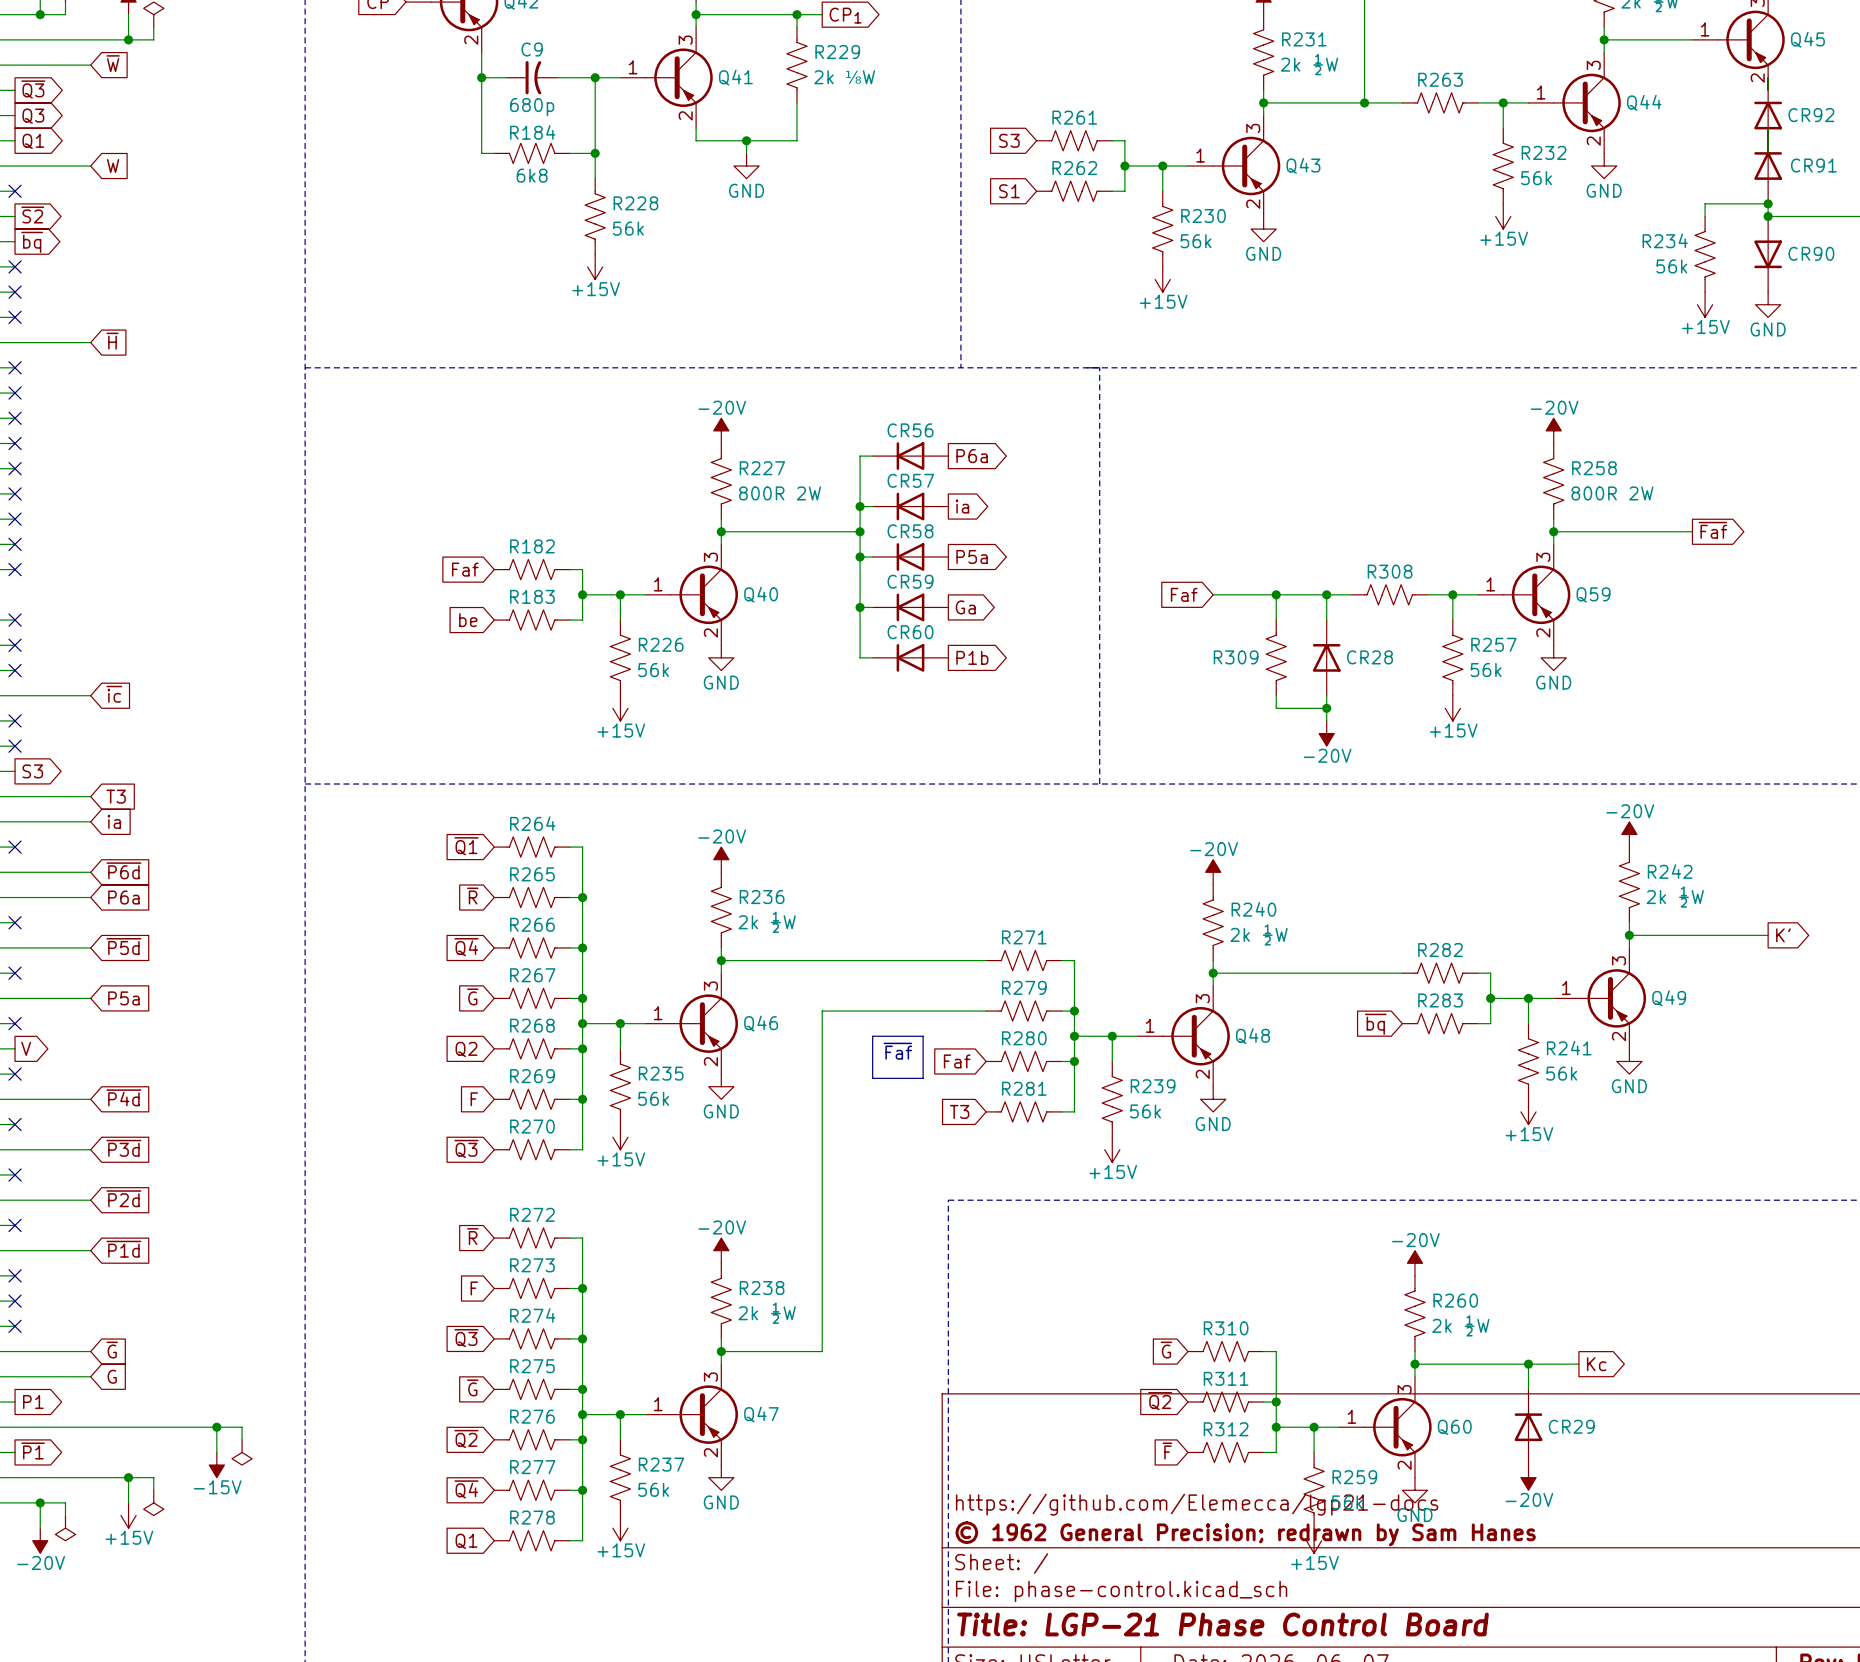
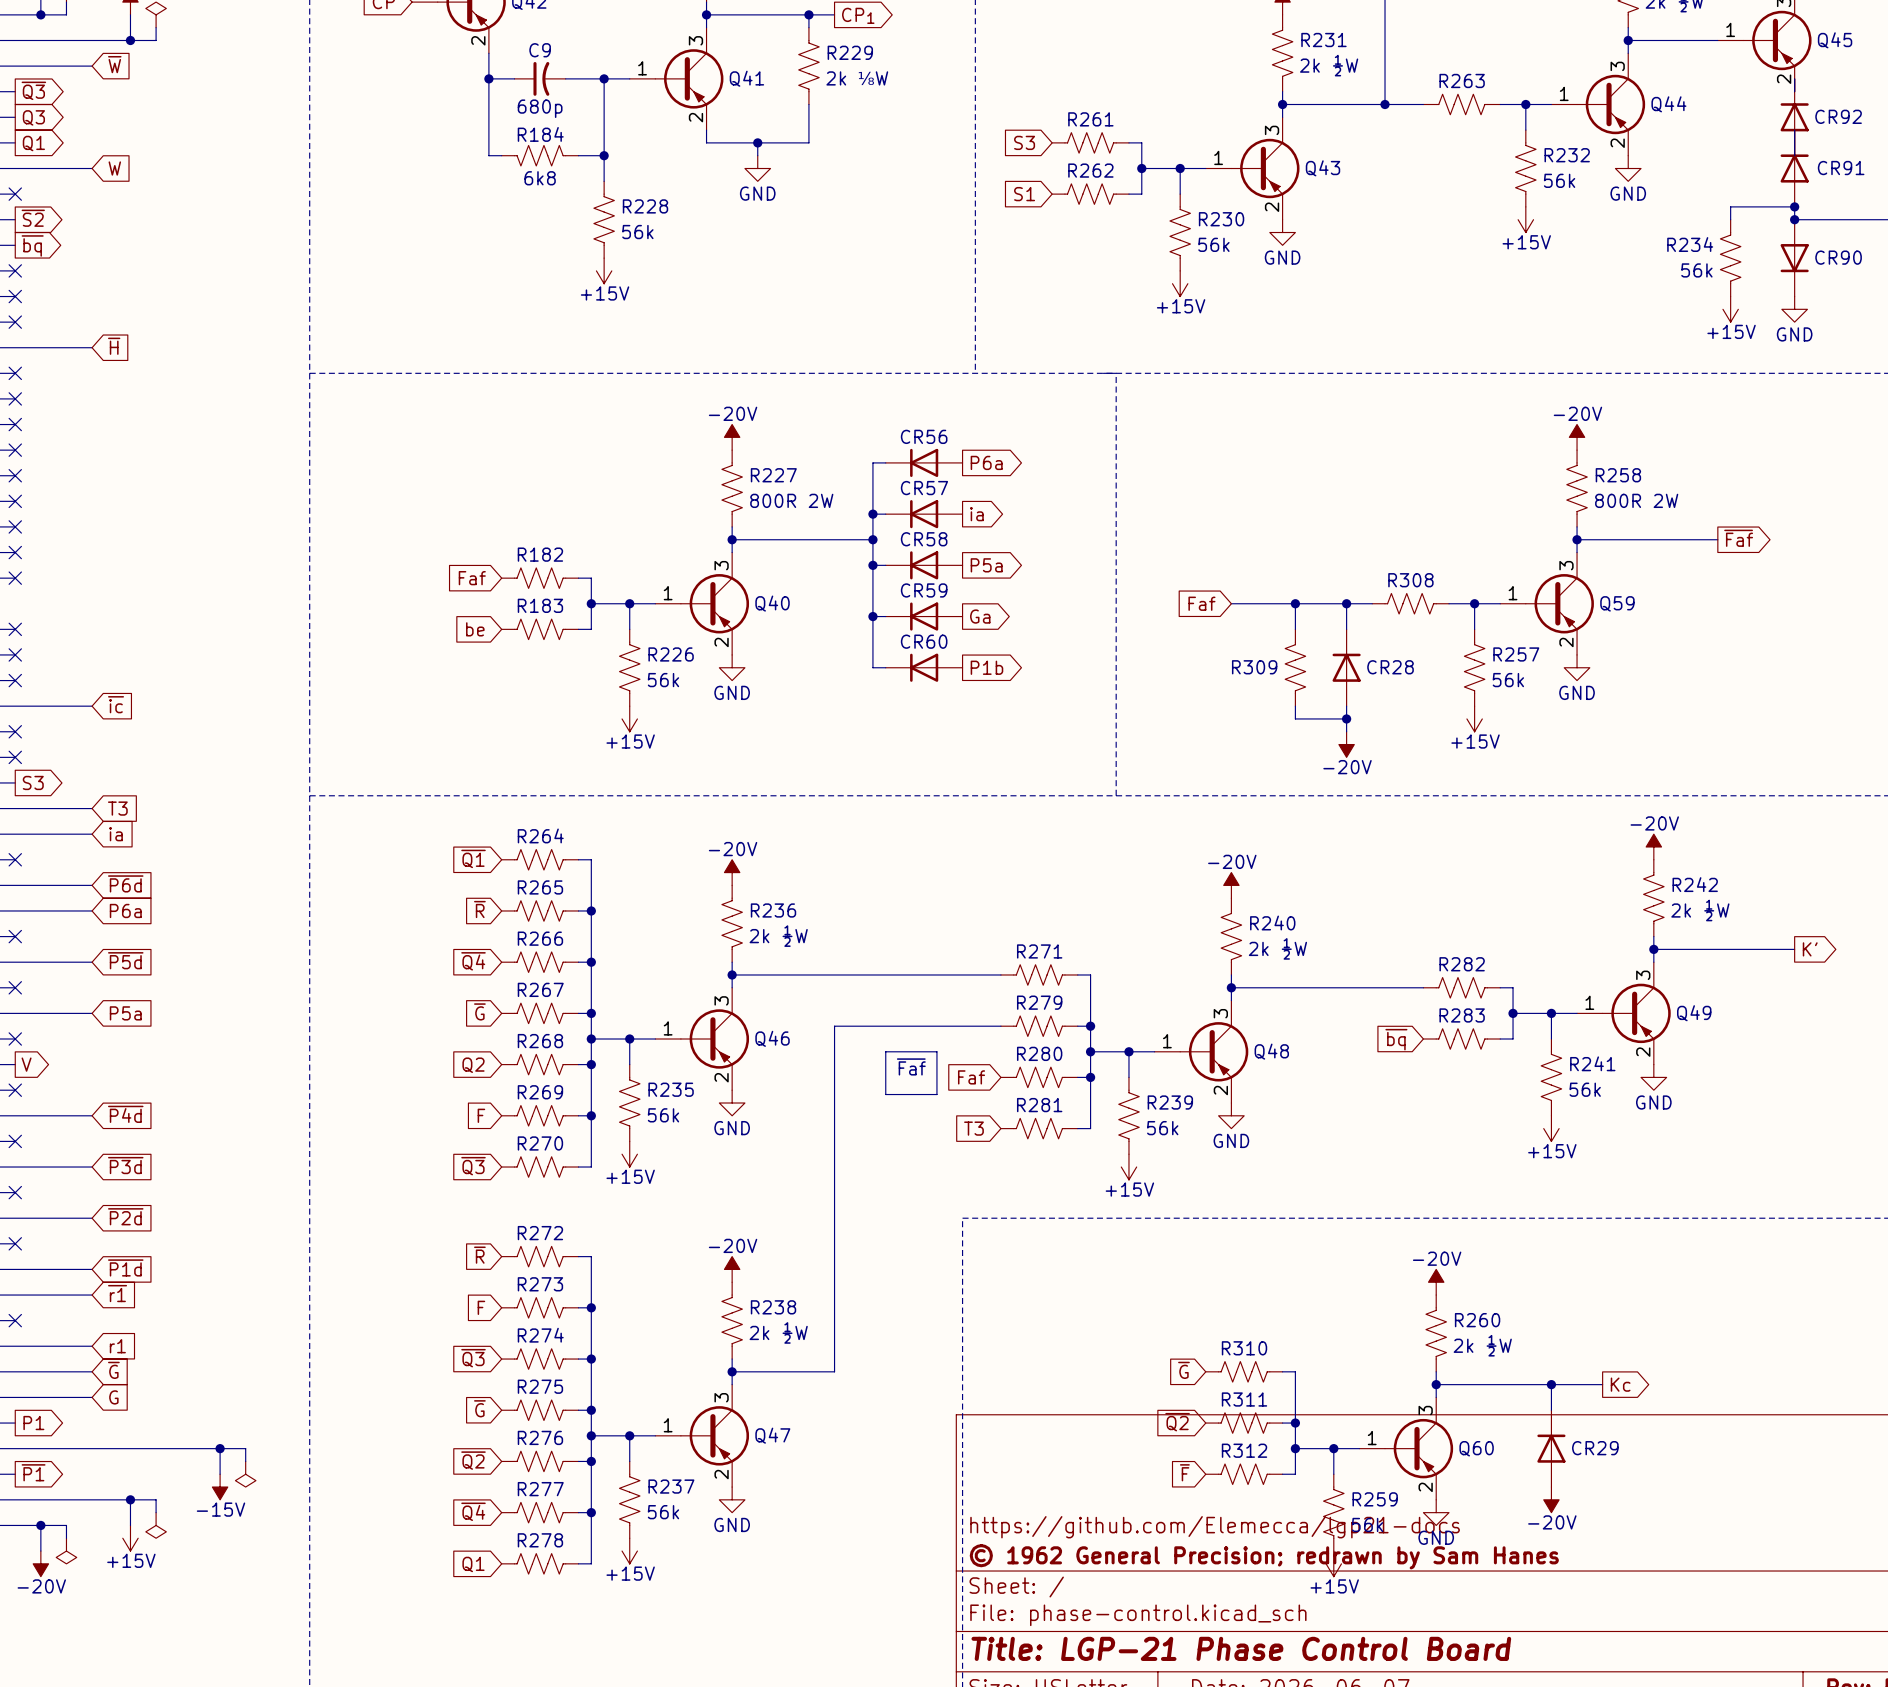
global label: none -> ~{r1} (117, 1293)
wire: none -> (15, 1295) (92, 1295)
no-connect mark: (15, 1275) -> none
wire: none -> (15, 1346) (92, 1346)
no-connect mark: (15, 1326) -> none
global label: none -> r1 (117, 1346)

